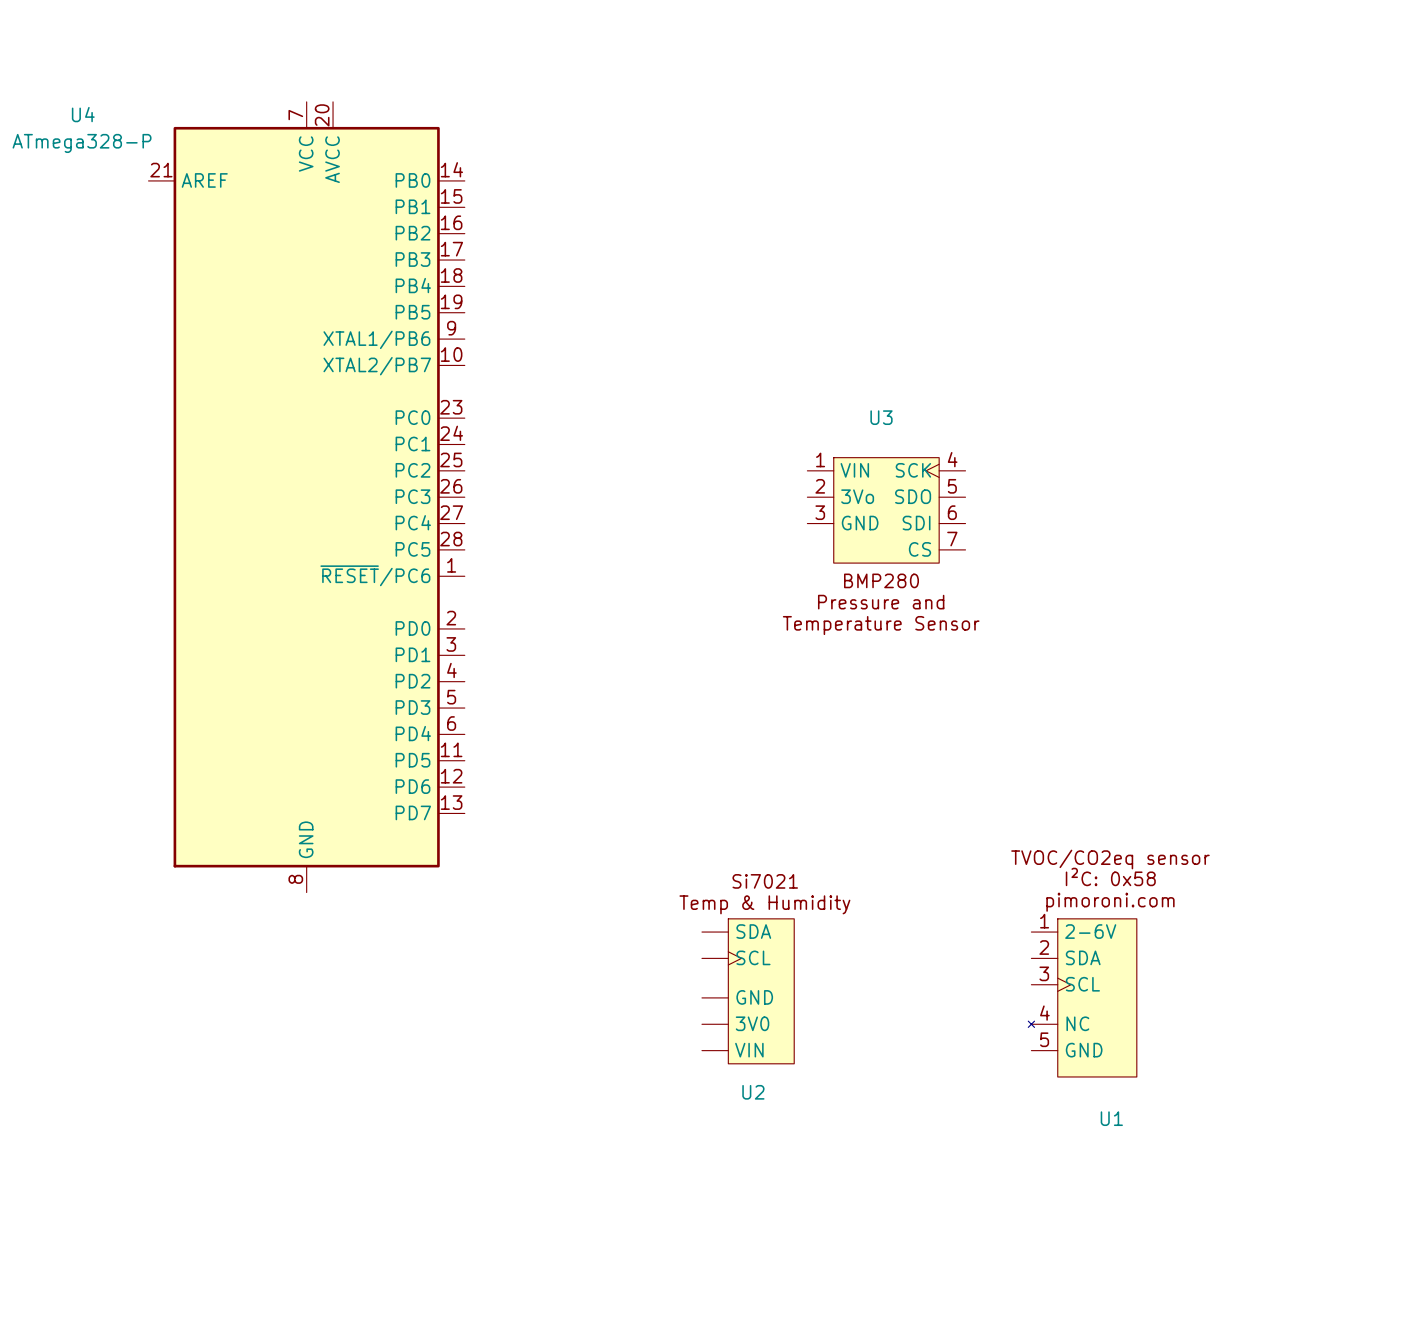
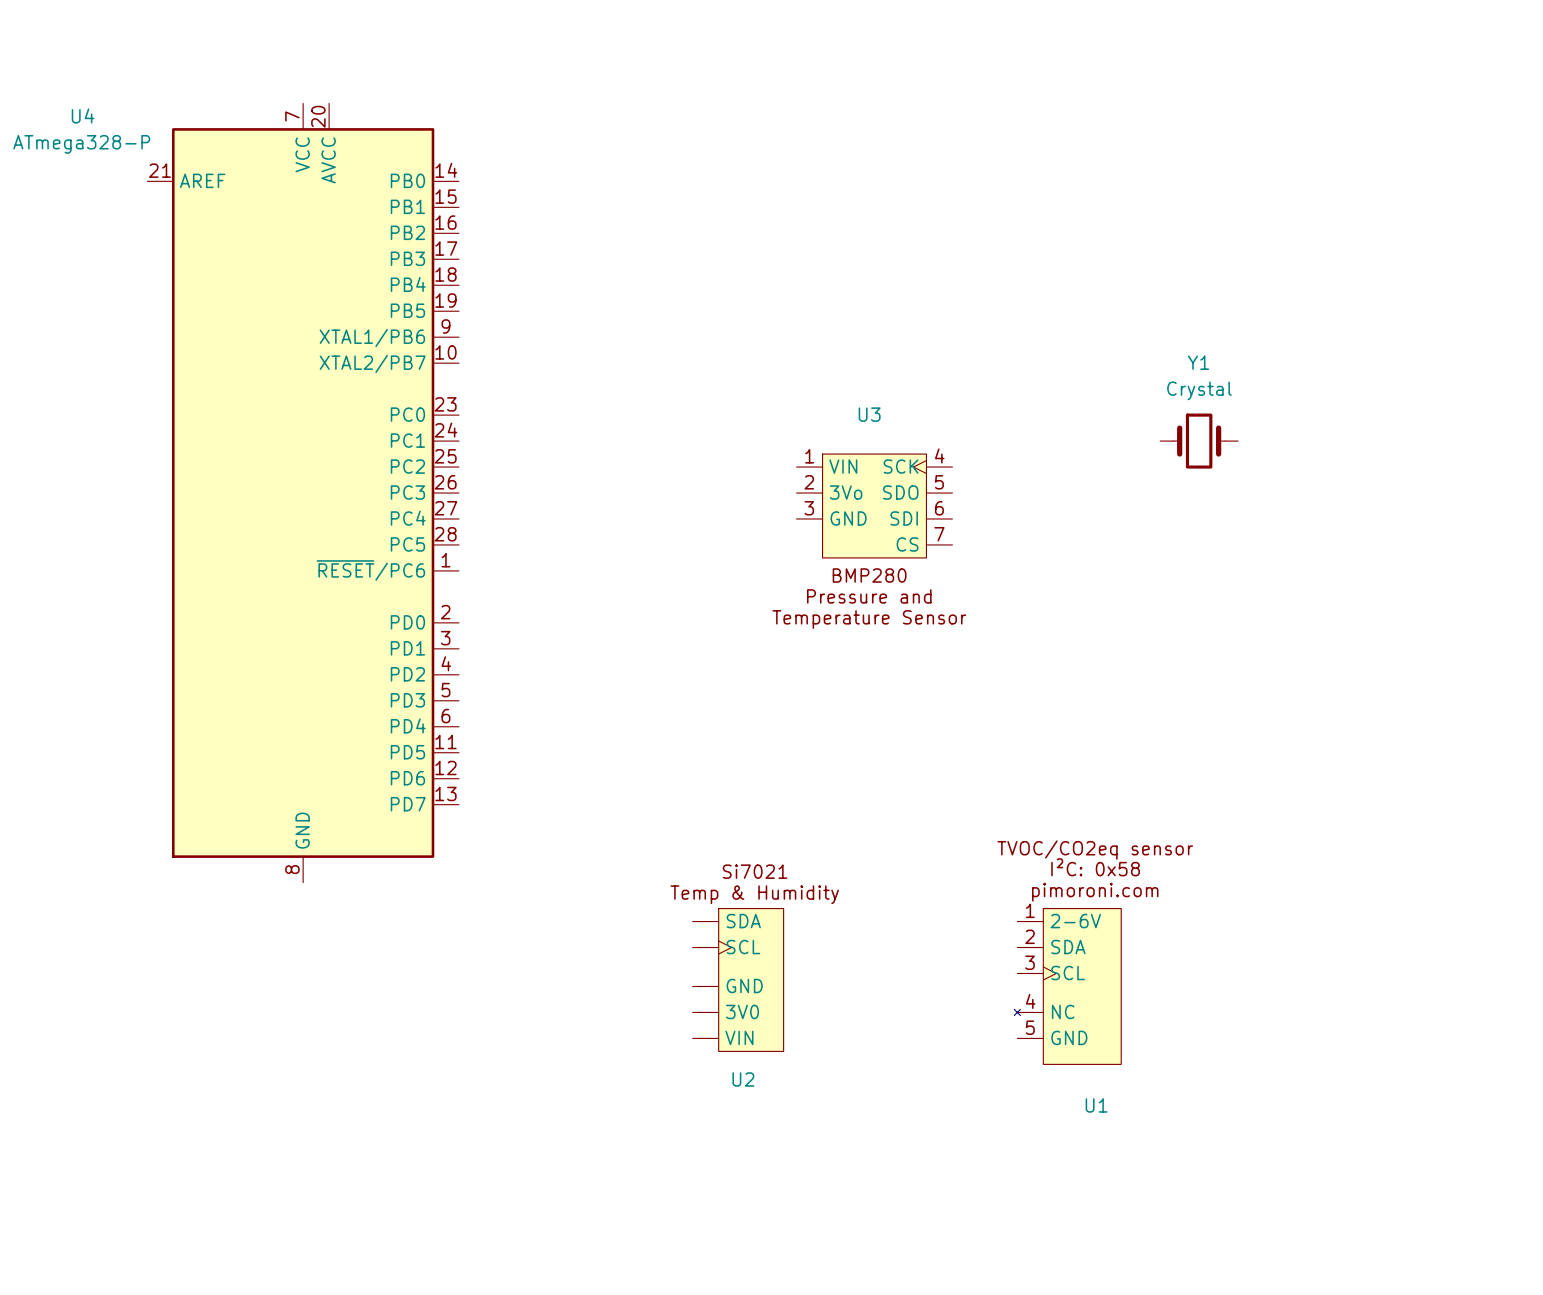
Y1: none -> Crystal (1199, 441)

